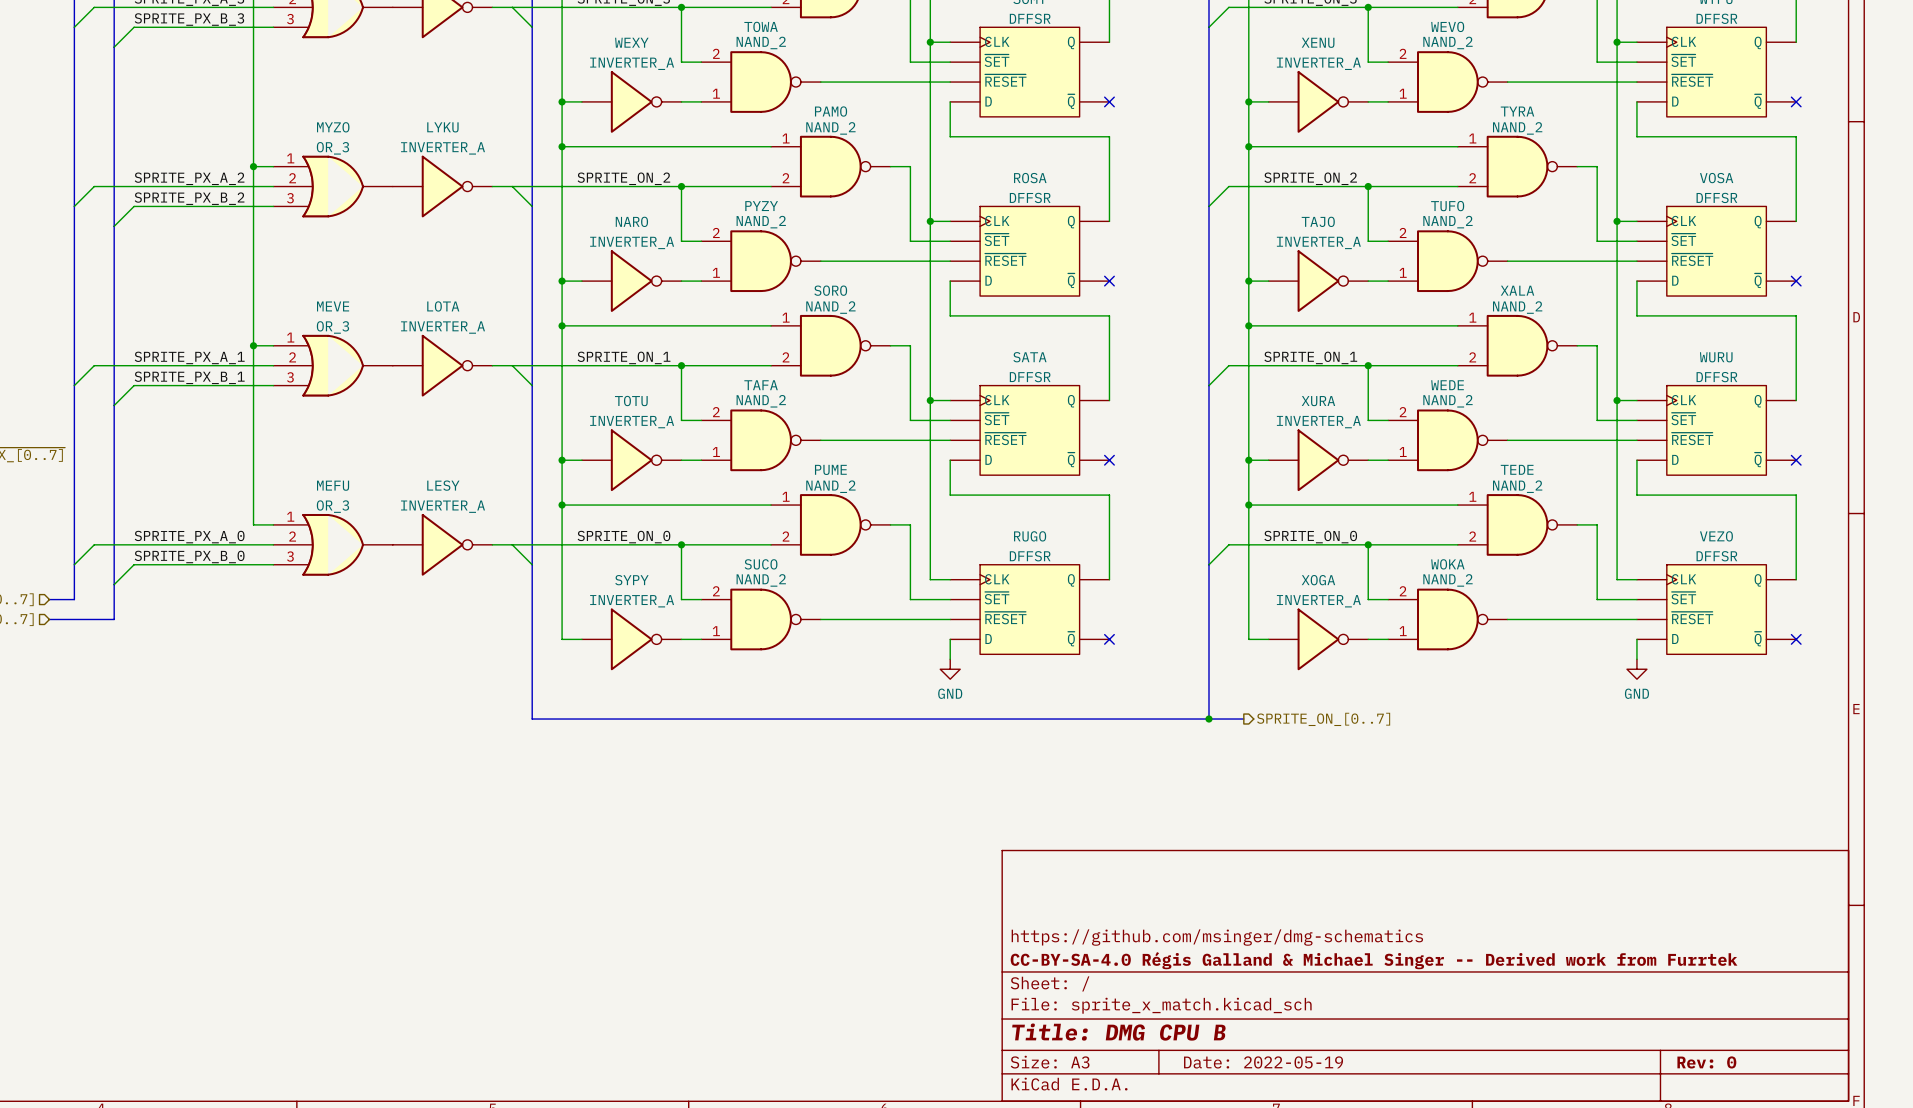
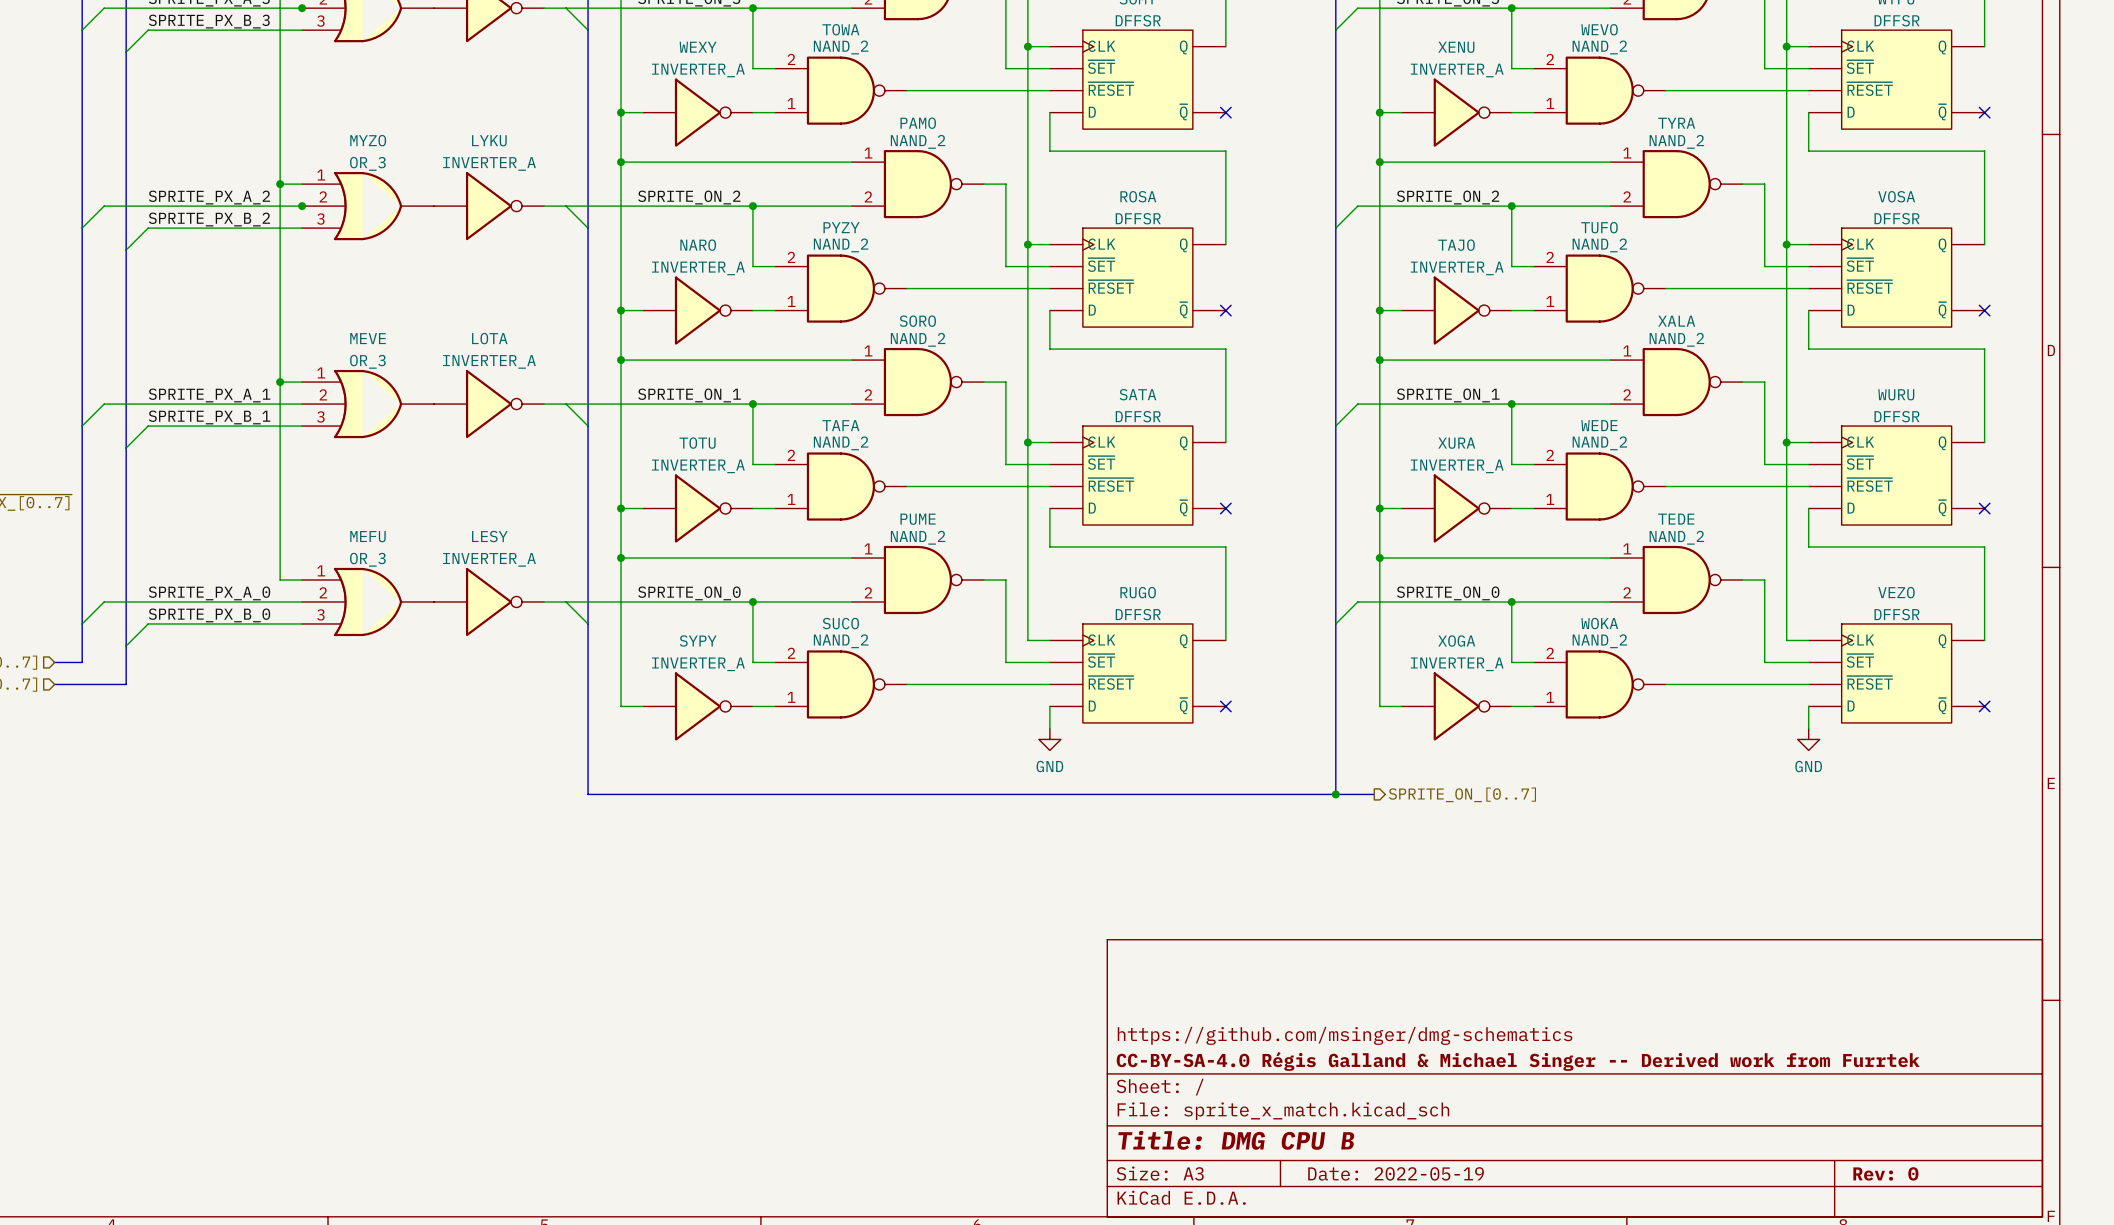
junction: none -> (302, 8)
junction: none -> (302, 206)

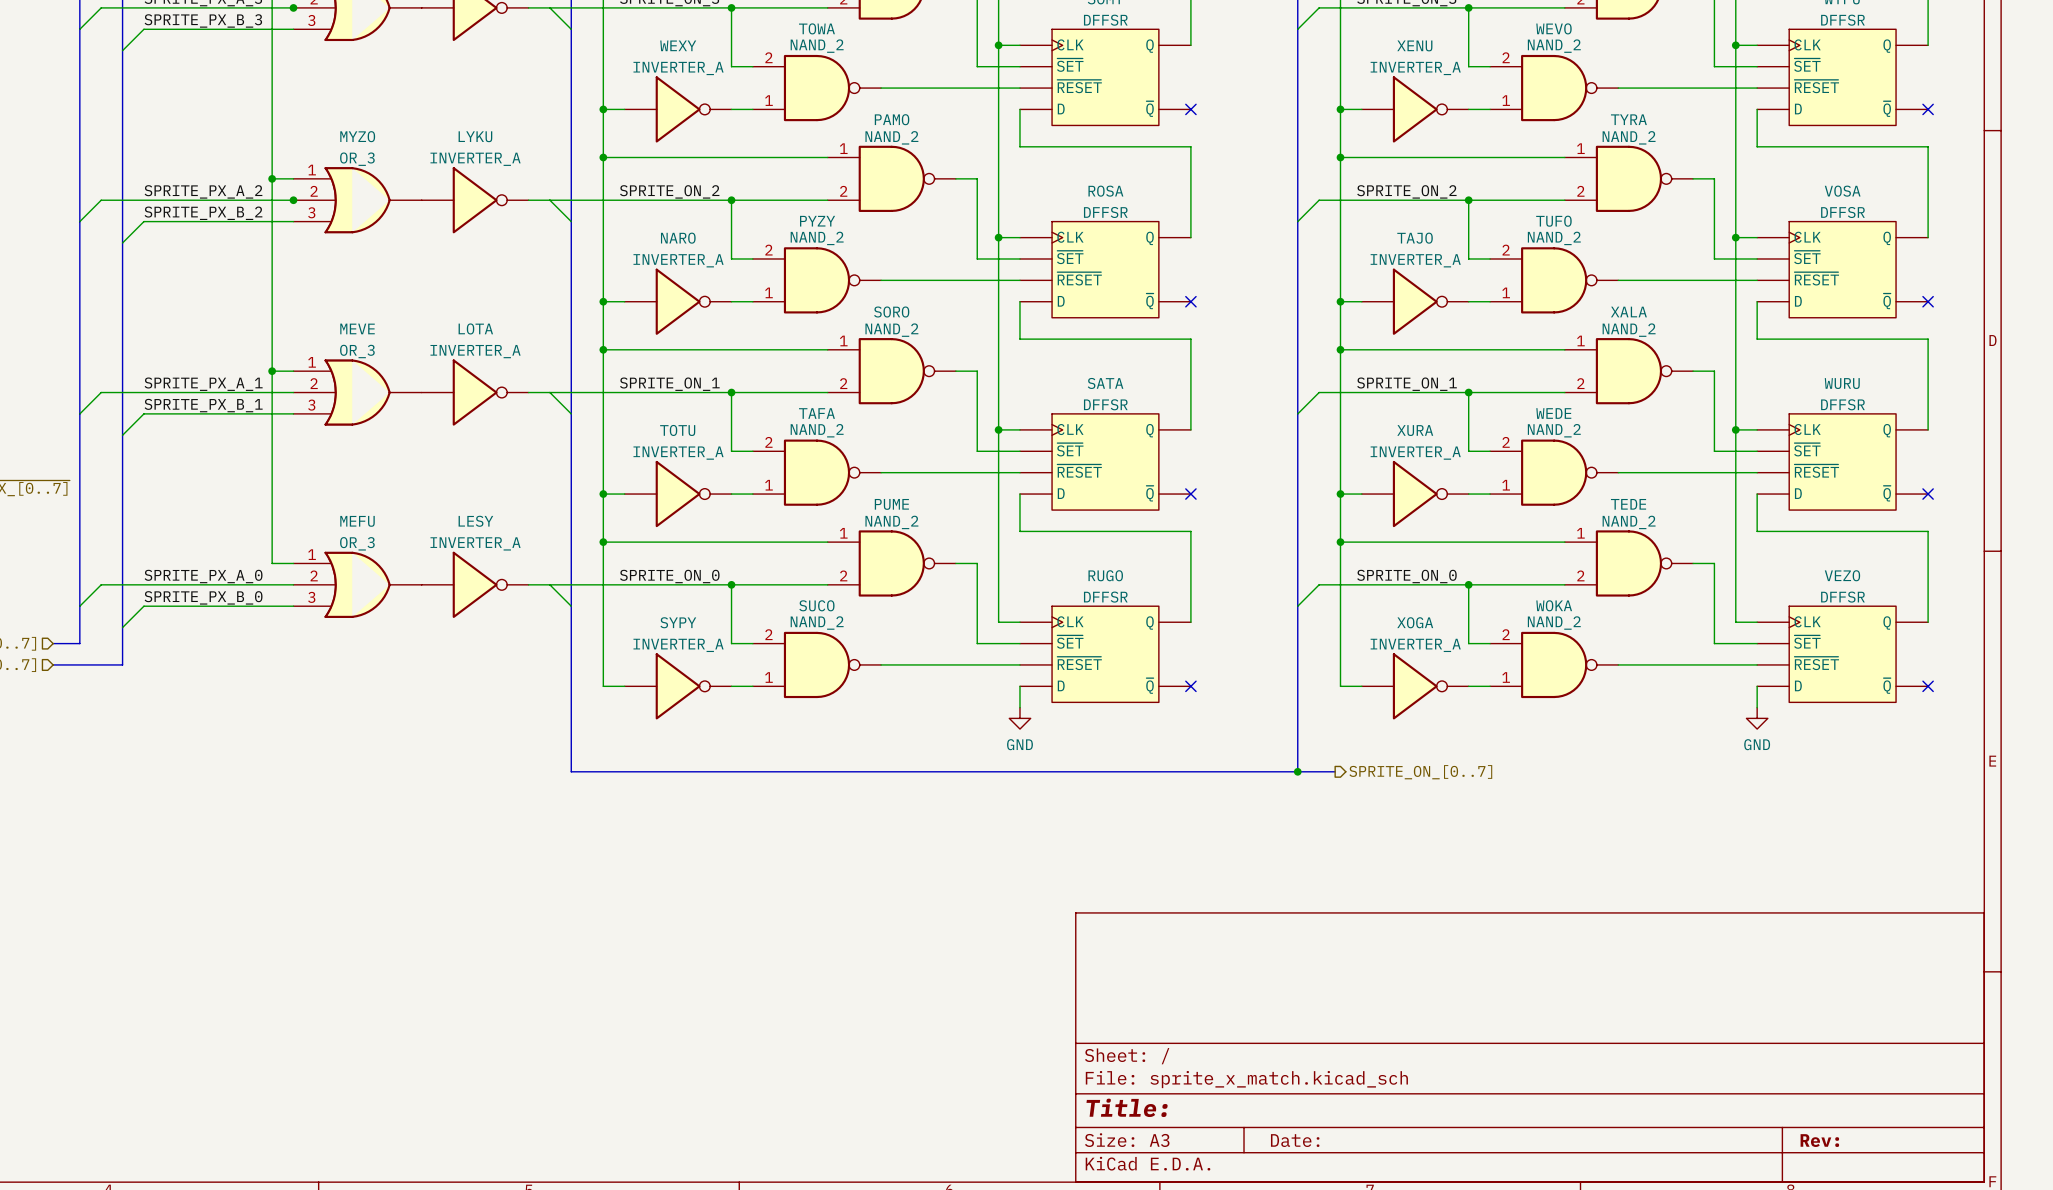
title block: https://github.com/msinger/dmg-schematics (1345, 1035) -> none
title block: CC-BY-SA-4.0 Régis Galland & Michael Singer -- Derived work from Furrtek (1518, 1061) -> none
title block: Title: DMG CPU B (1236, 1140) -> Title: (1127, 1107)
title block: Date: 2022-05-19 (1396, 1173) -> Date: (1295, 1140)
title block: Rev: 0 (1885, 1173) -> Rev: (1819, 1140)

